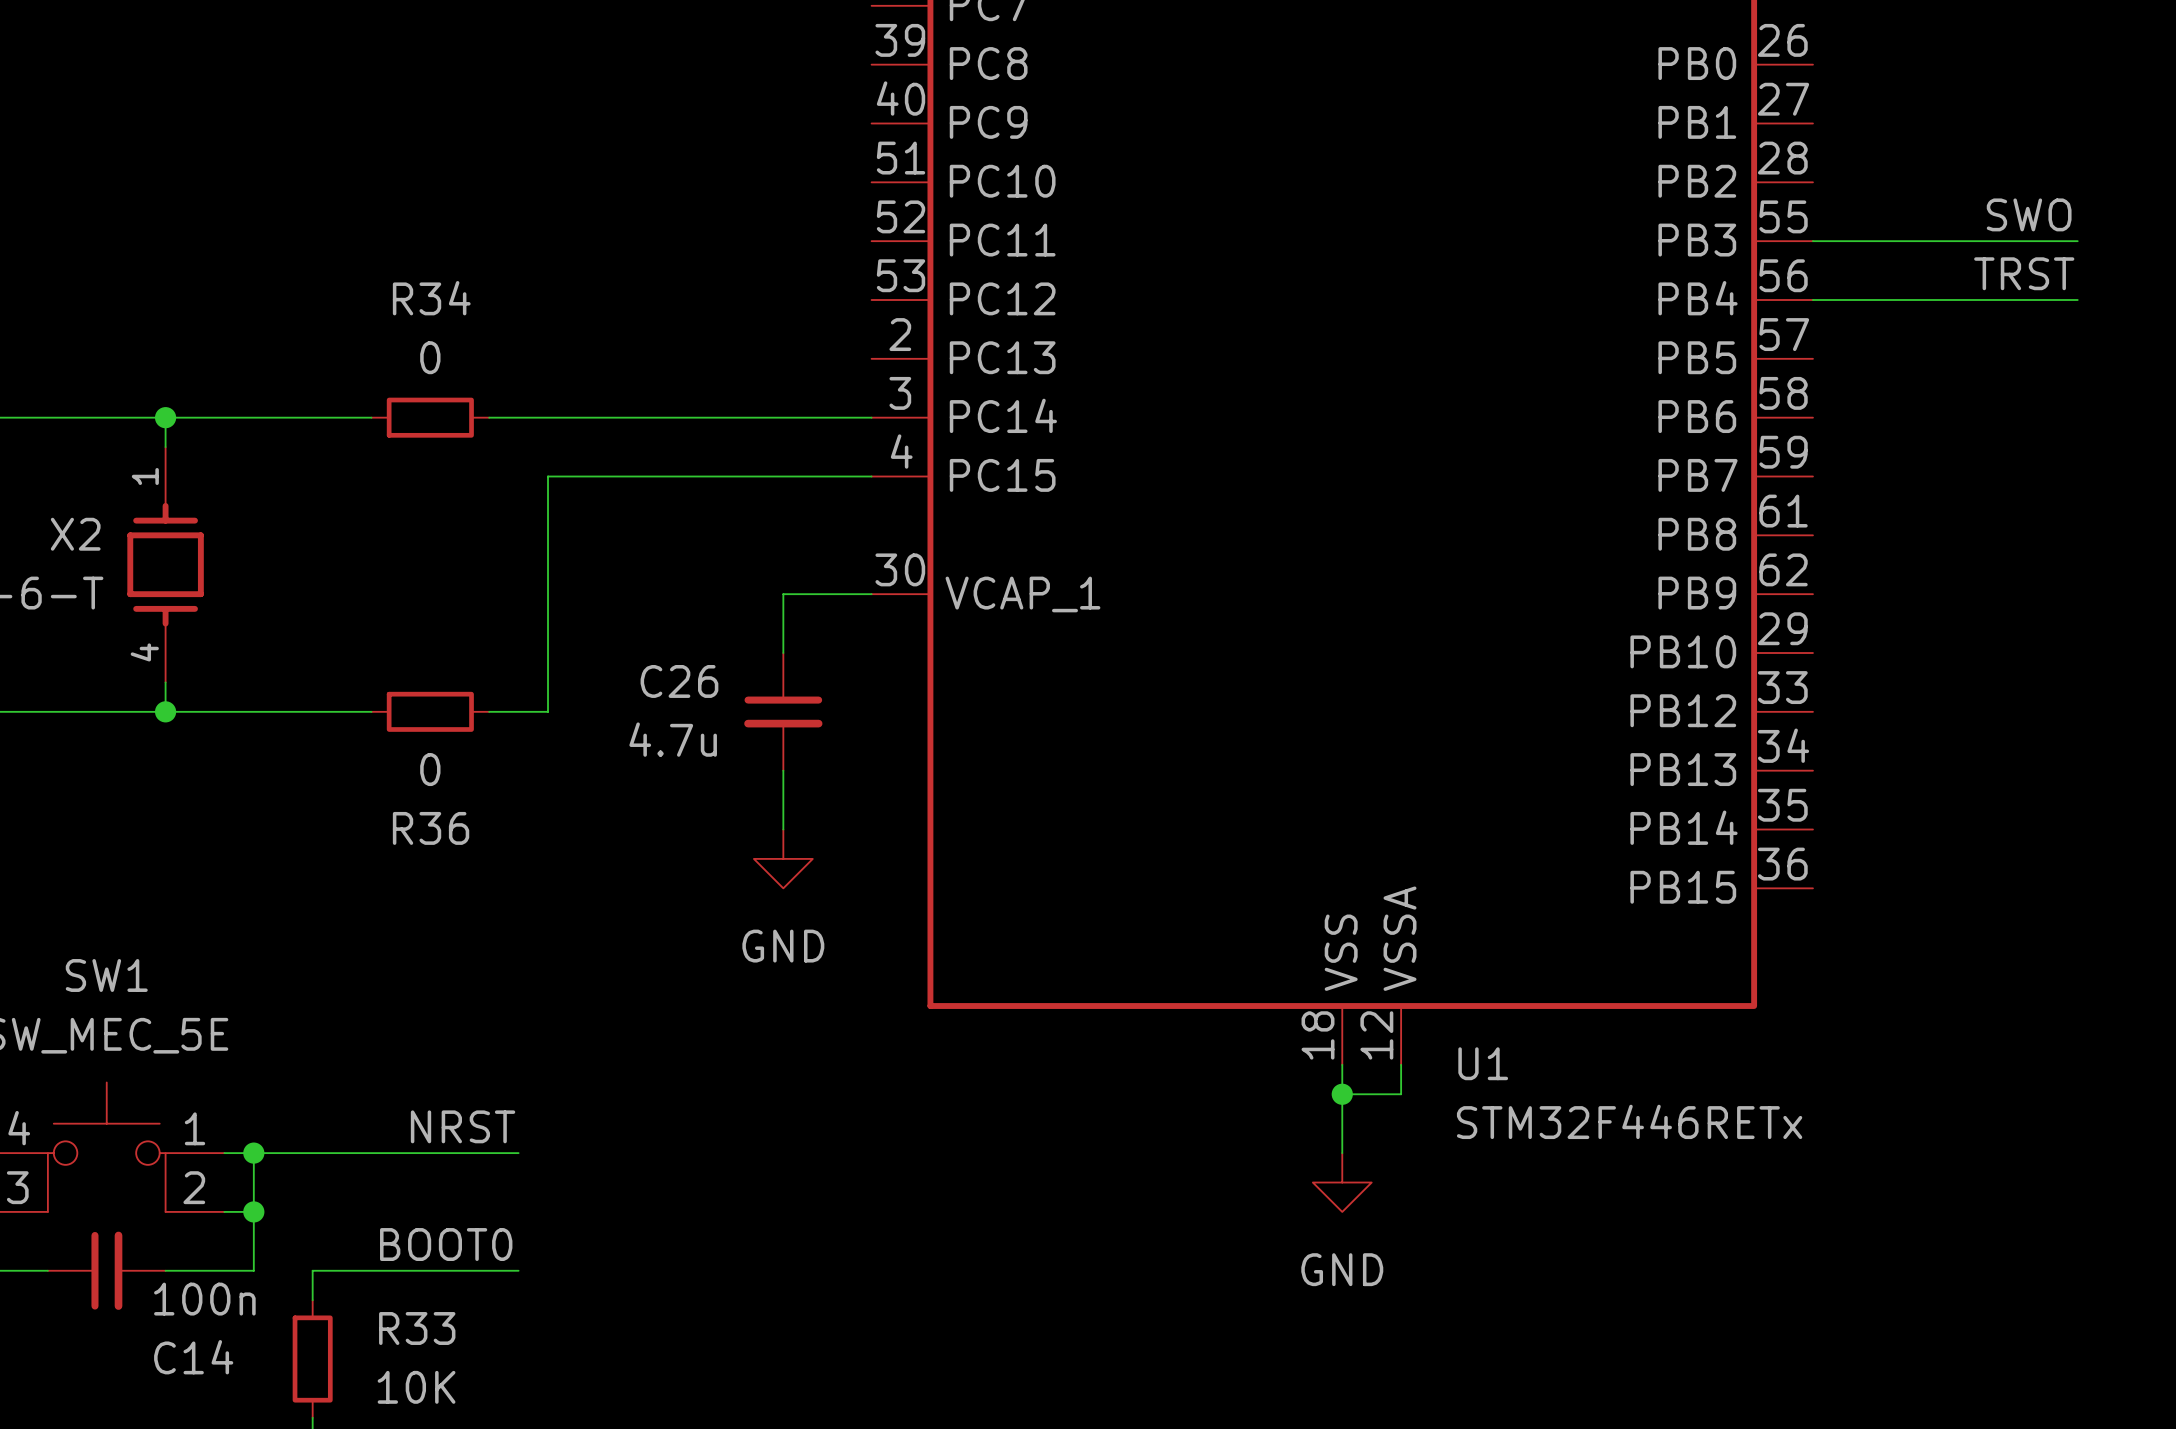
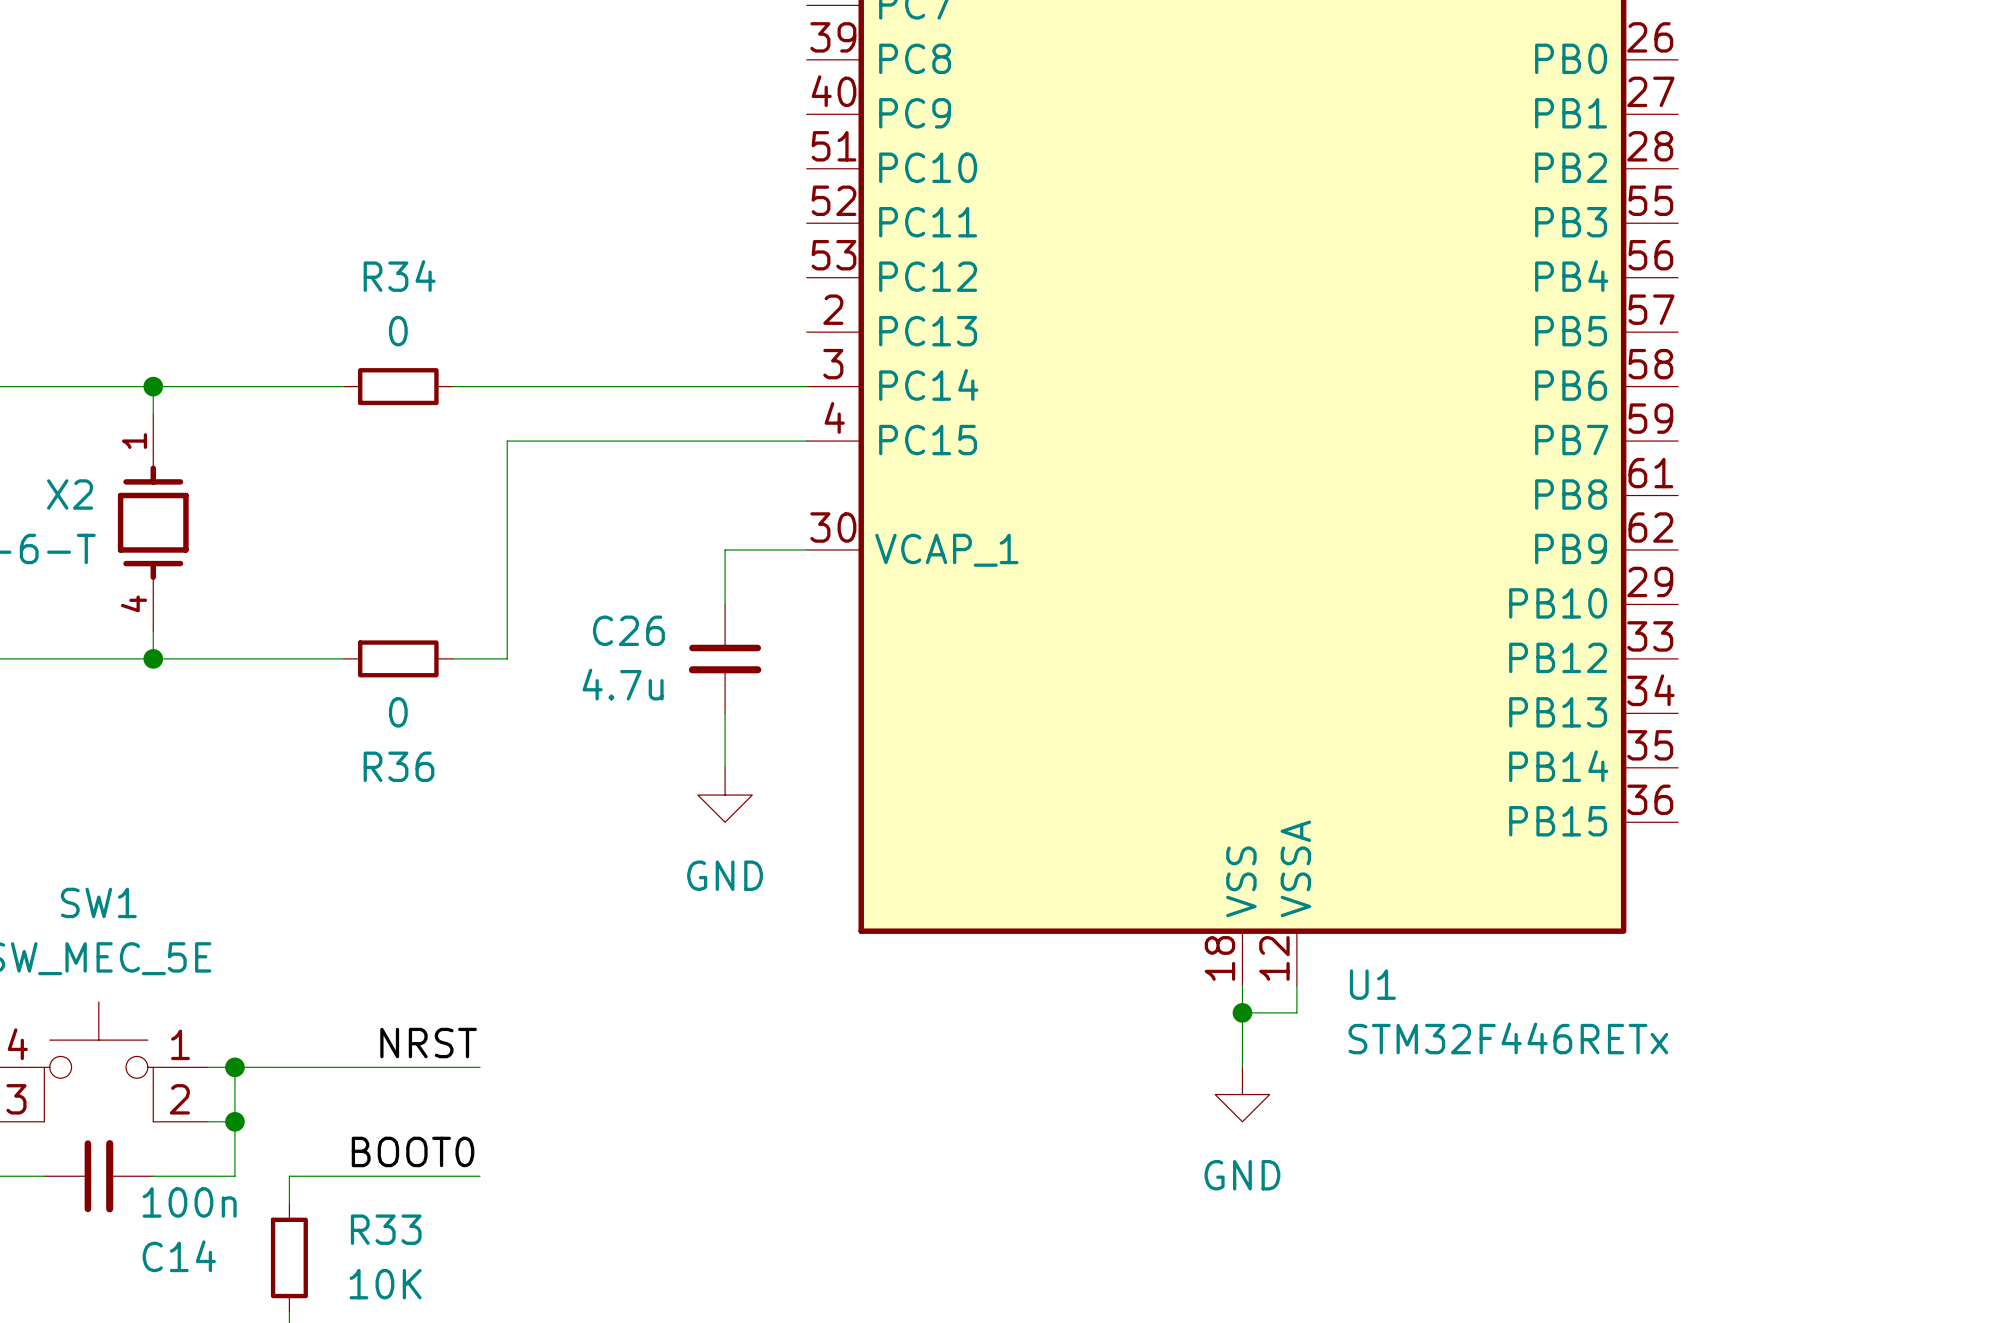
label: SWO (2029, 214) -> none
wire: (1812, 241) (2077, 241) -> none
label: TRST (2024, 273) -> none
wire: (1812, 299) (2077, 299) -> none

